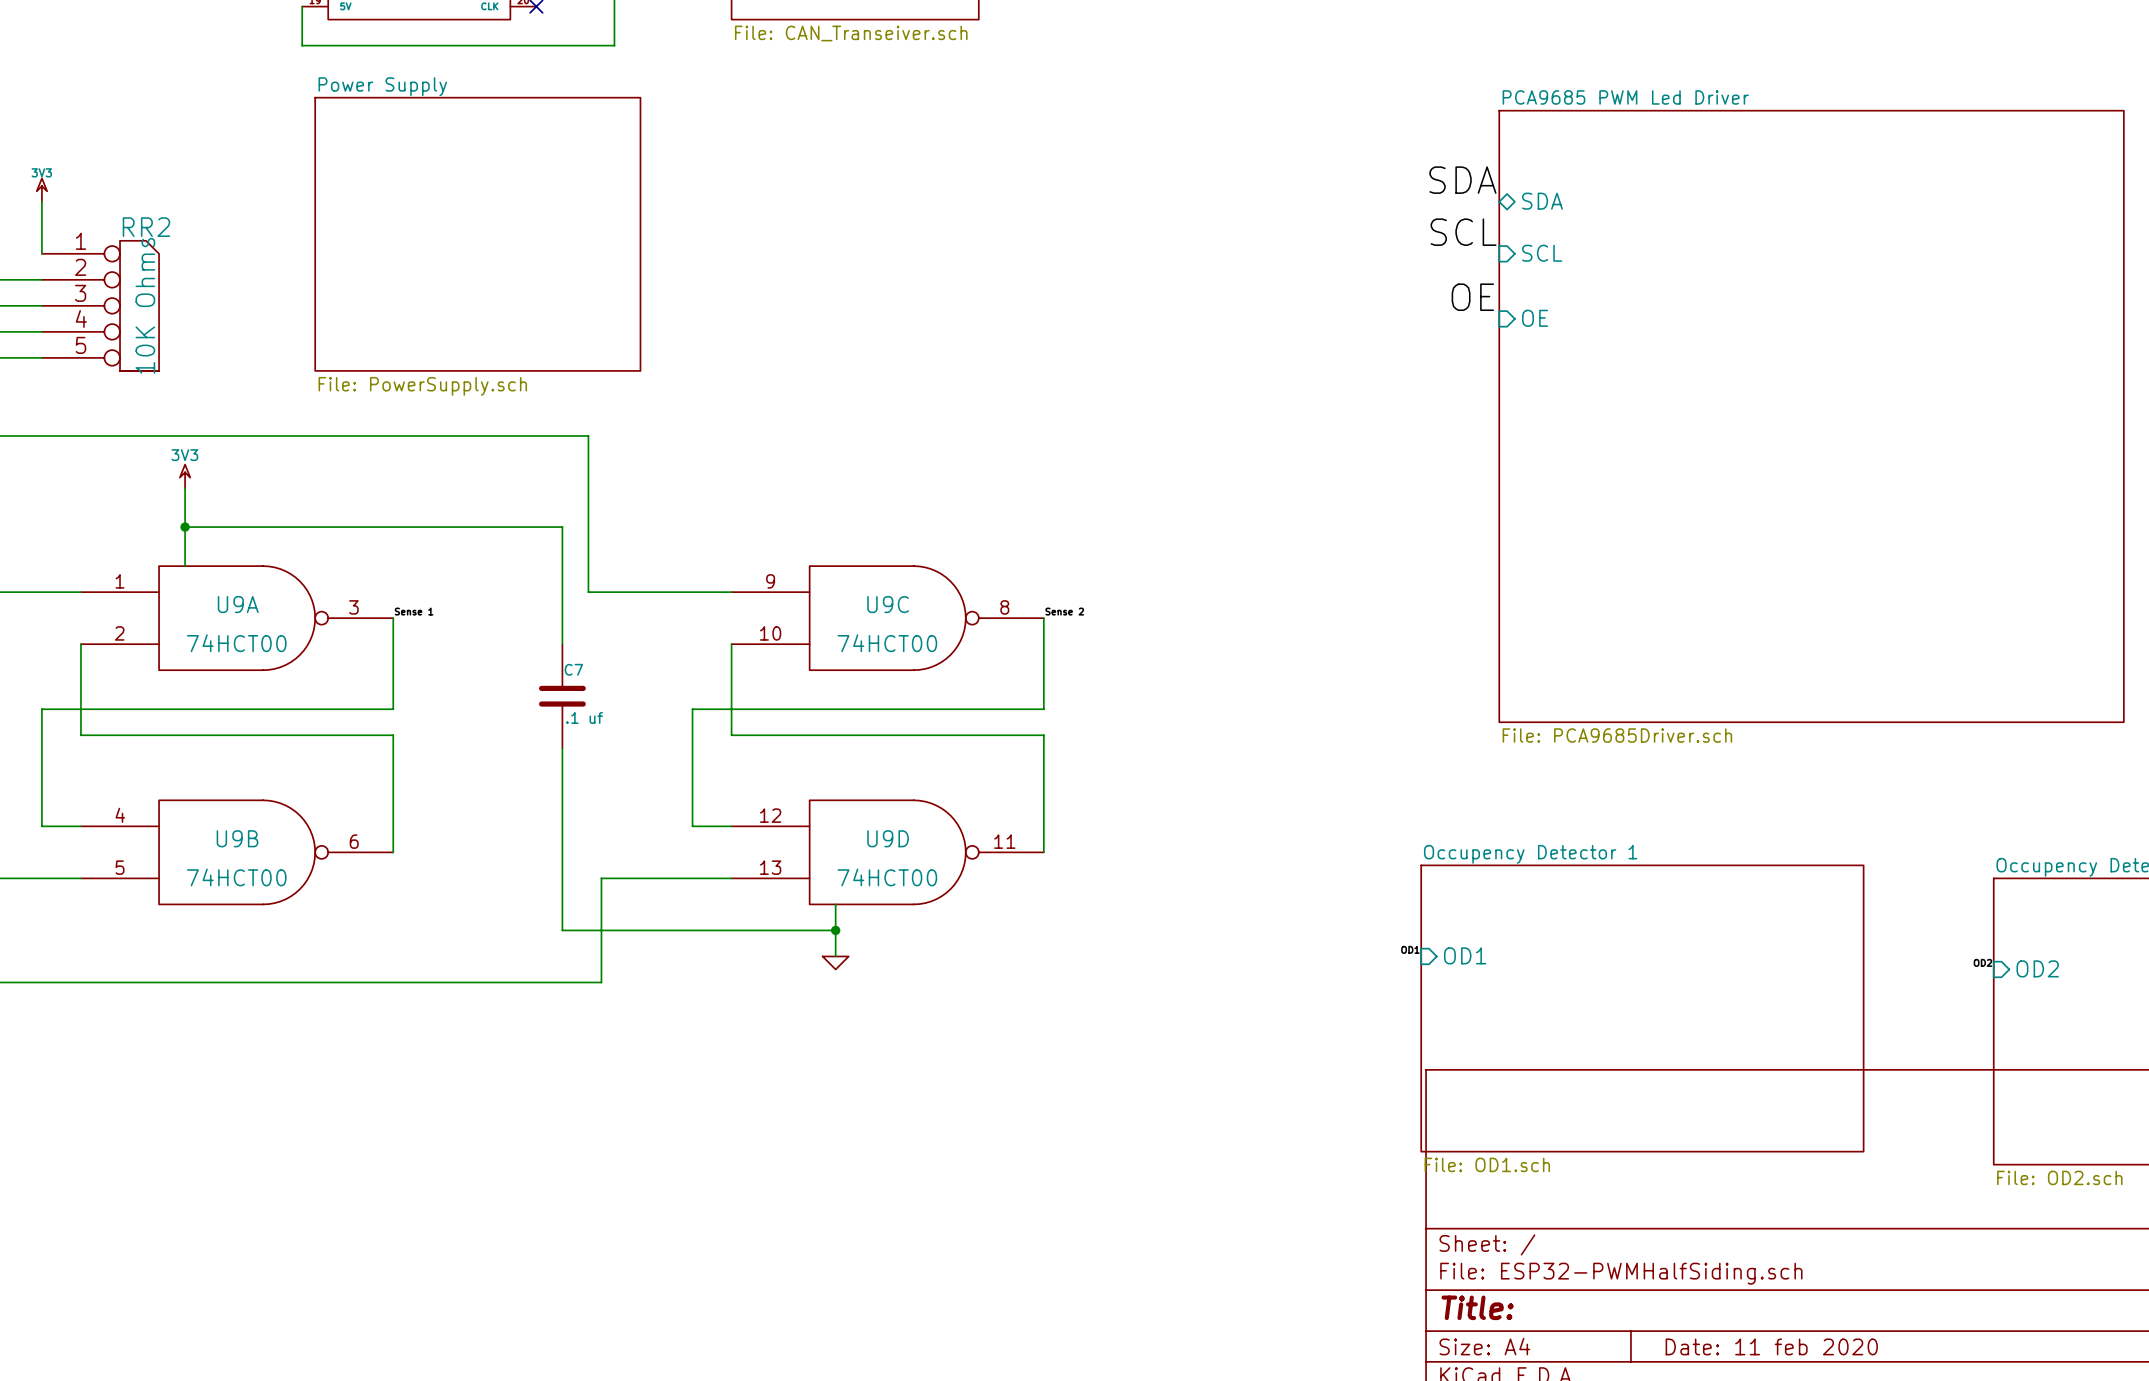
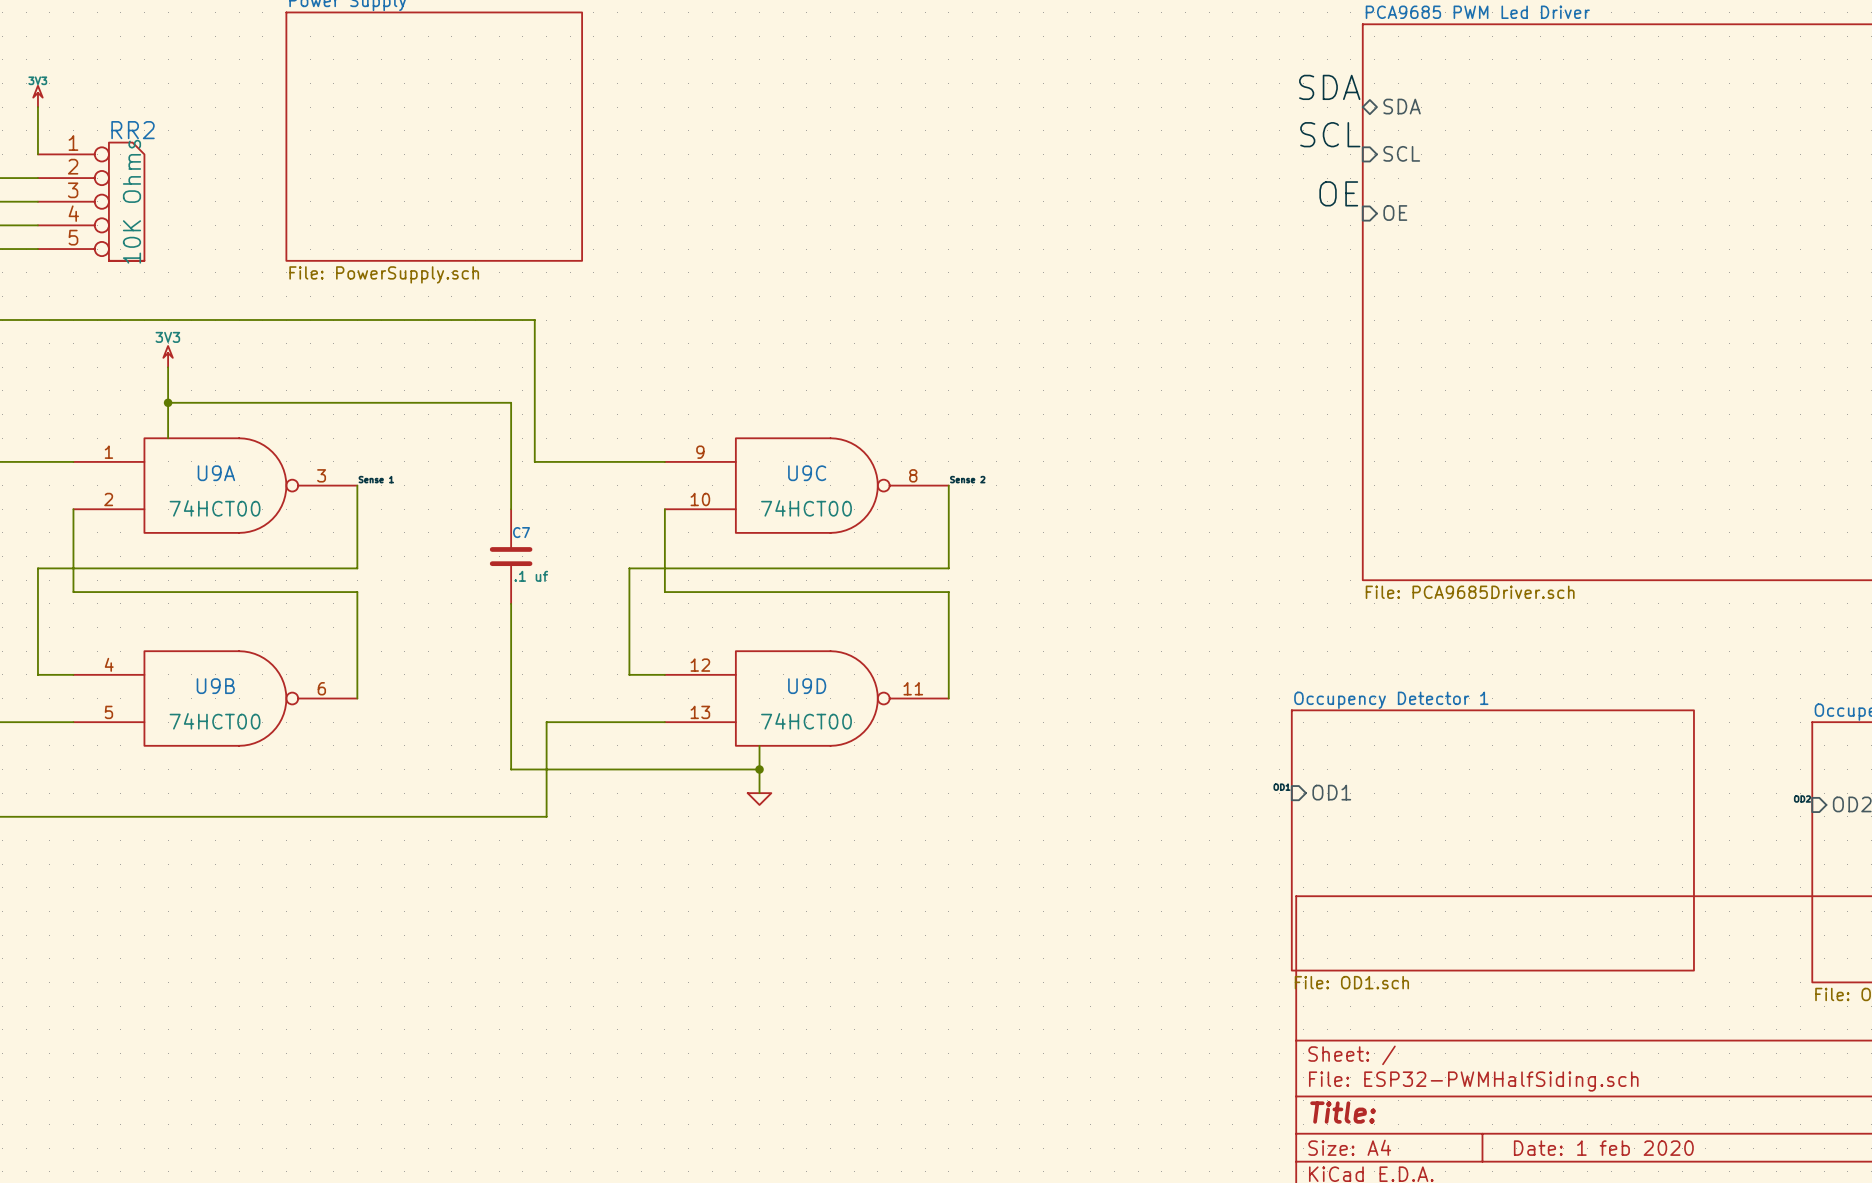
title block: Date: 11 feb 2020 (1771, 1346) -> Date: 1 feb 2020 (1603, 1148)

